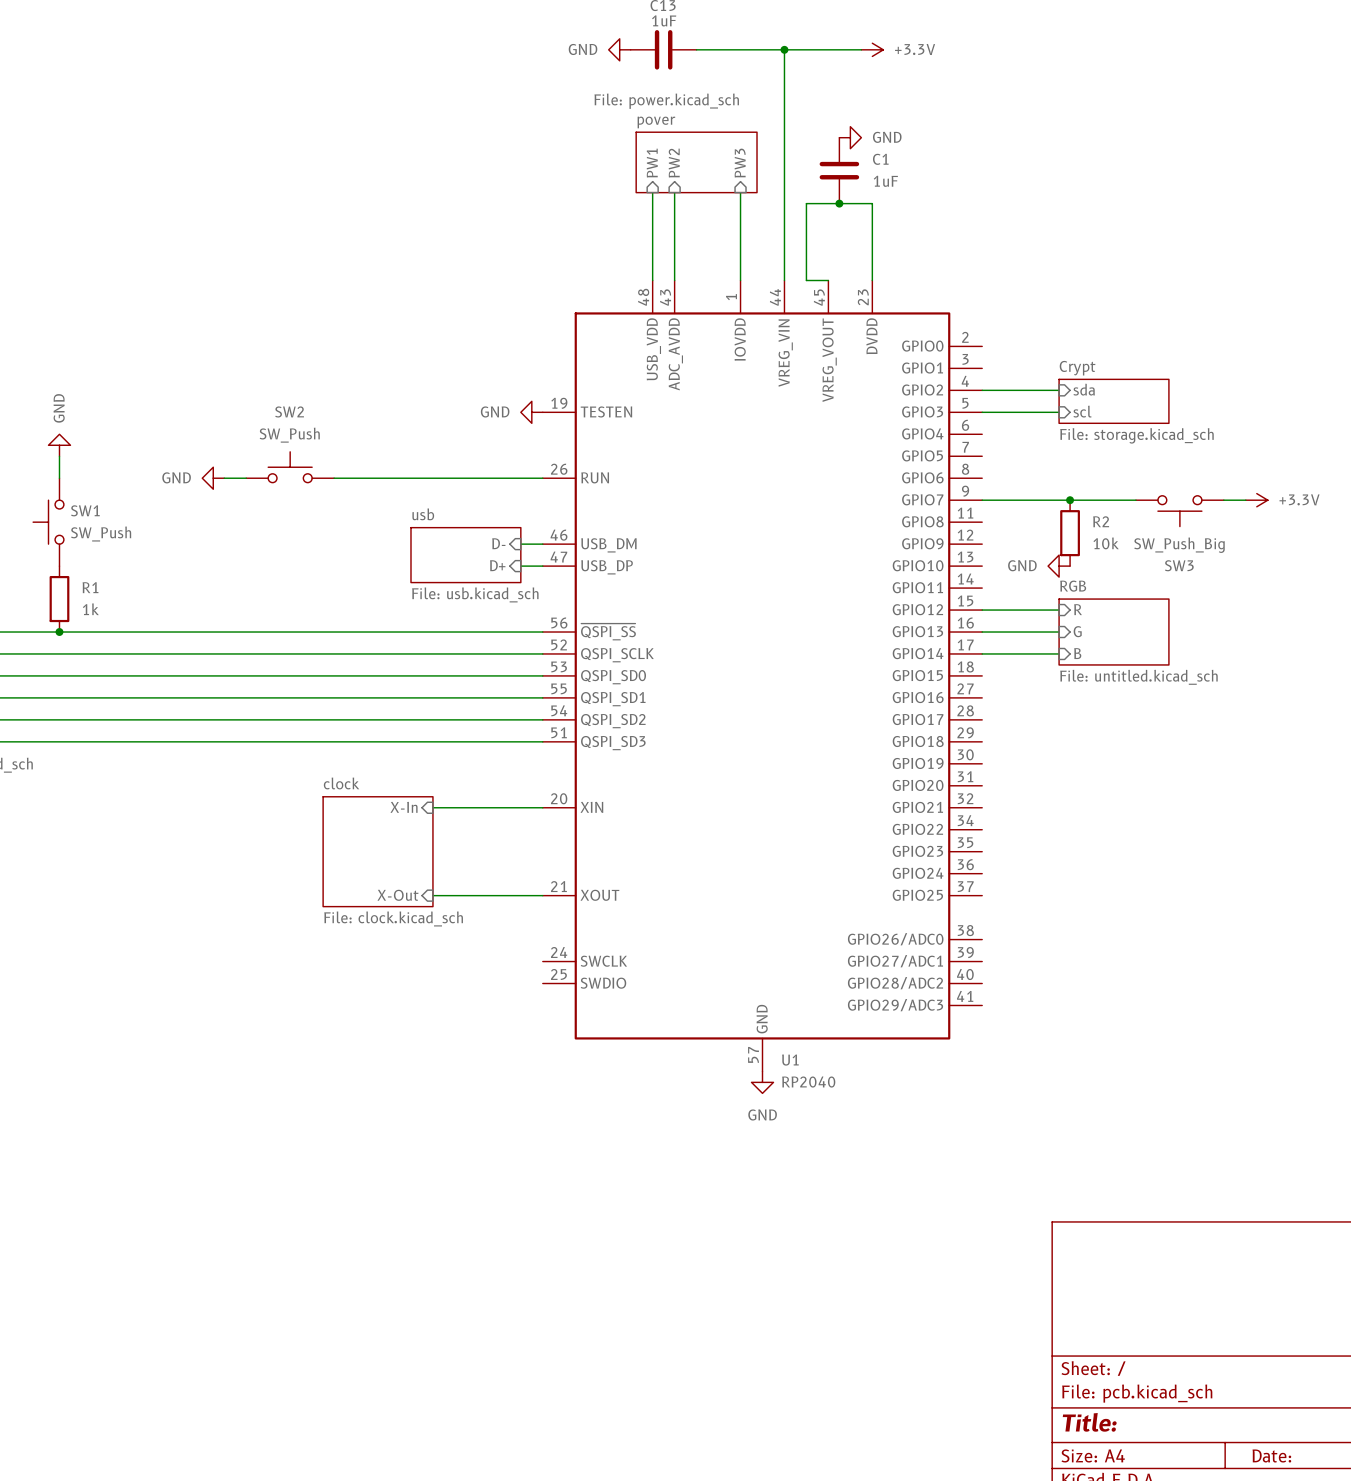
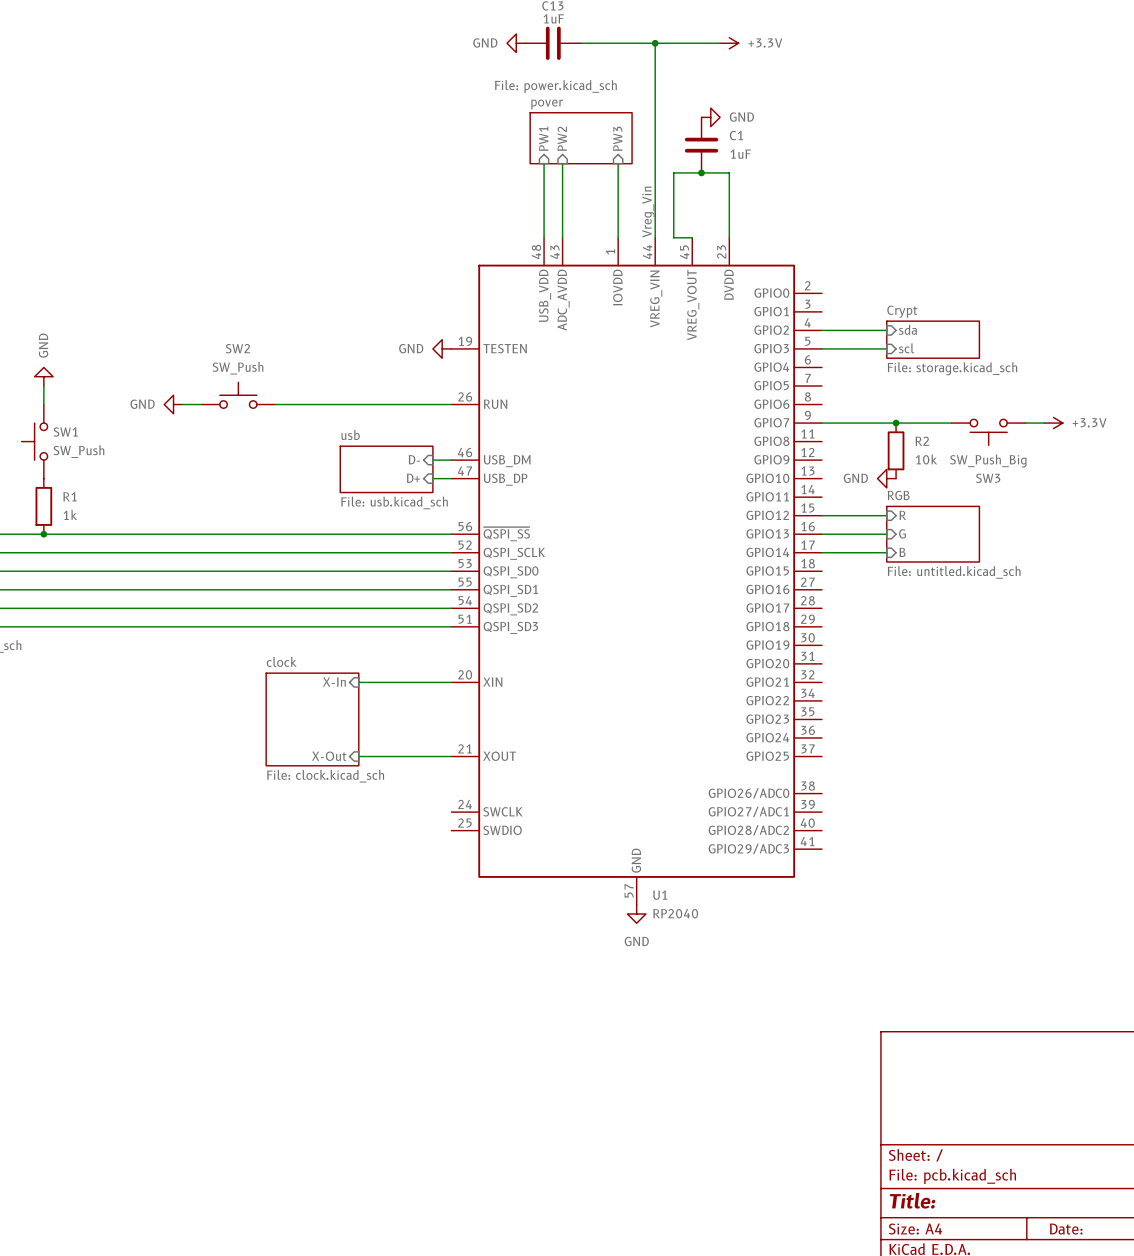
label: none -> Vreg_Vin (648, 211)

